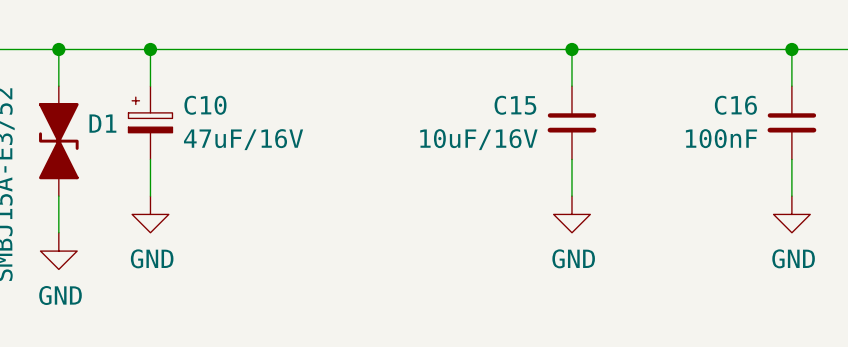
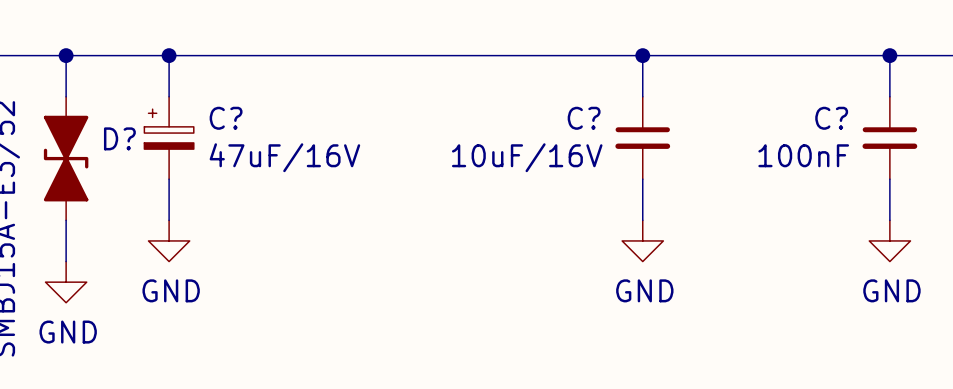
C10 name: C10 (205, 105) -> C? (226, 118)
C15 name: C15 (515, 105) -> C? (584, 118)
C16 name: C16 (735, 105) -> C? (831, 118)
D1 name: D1 (102, 123) -> D? (119, 138)

